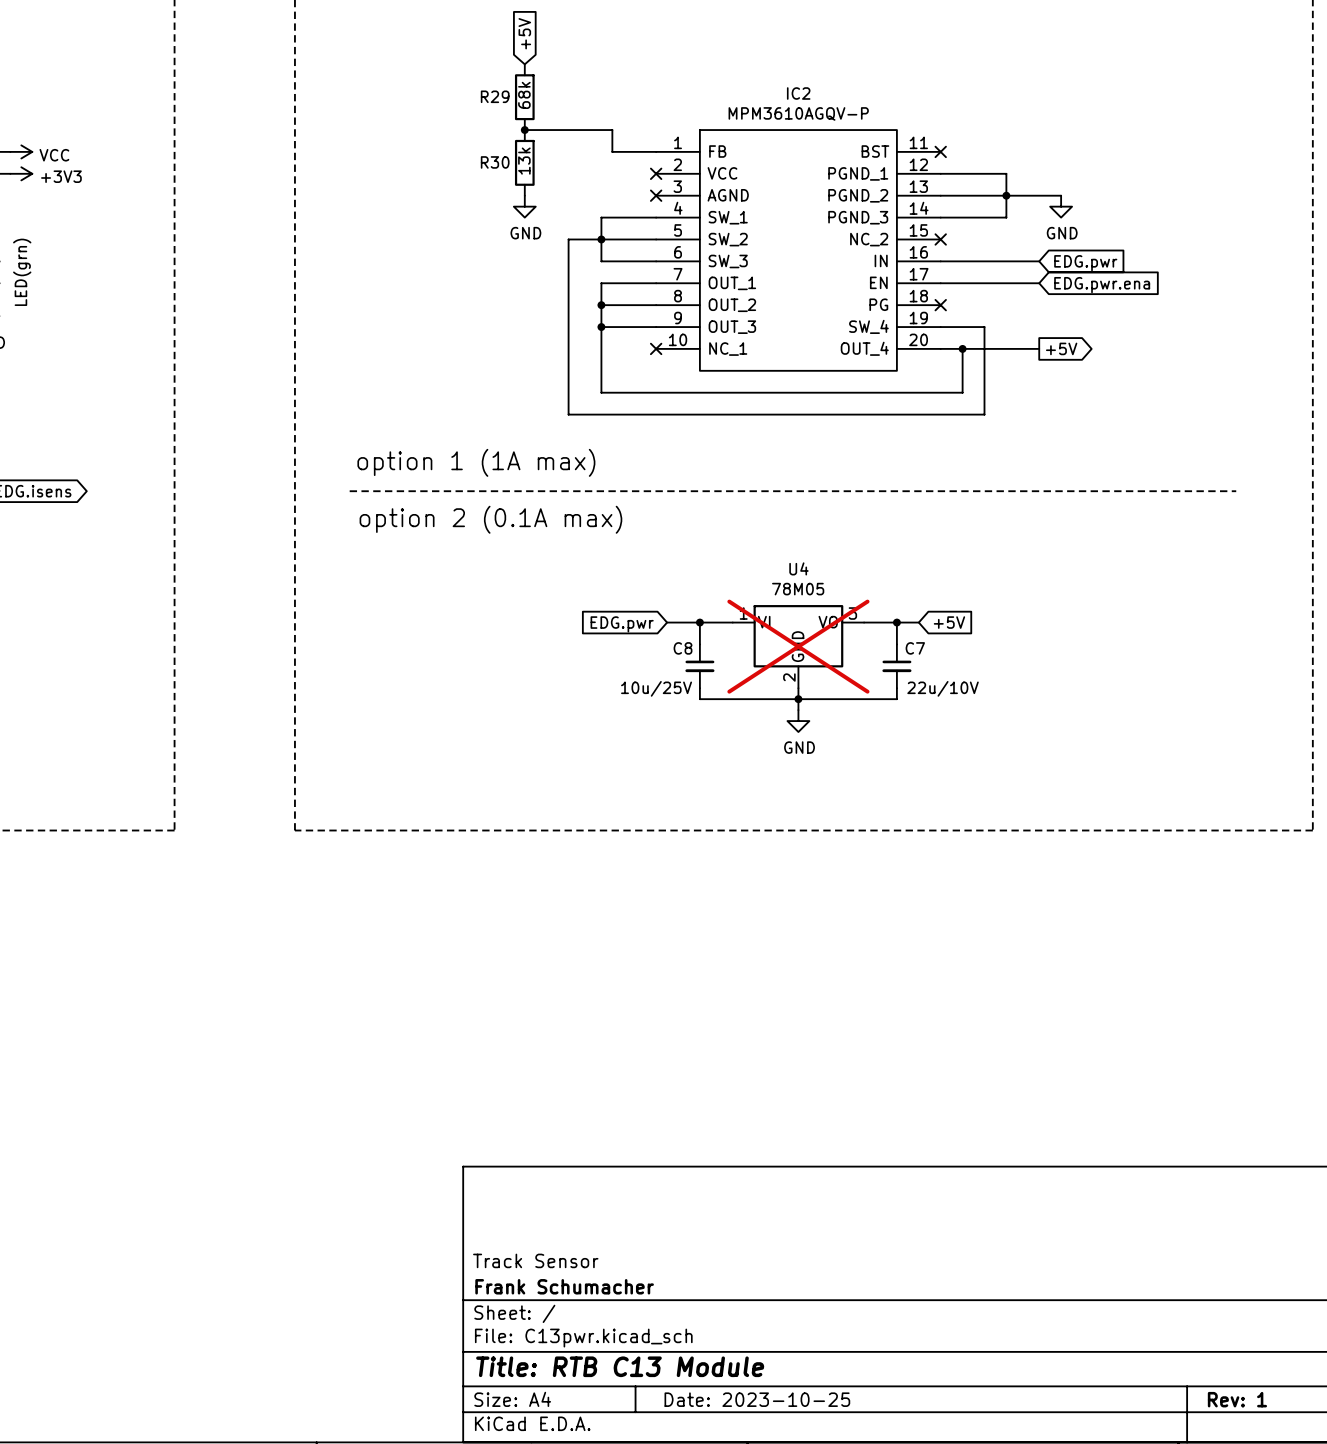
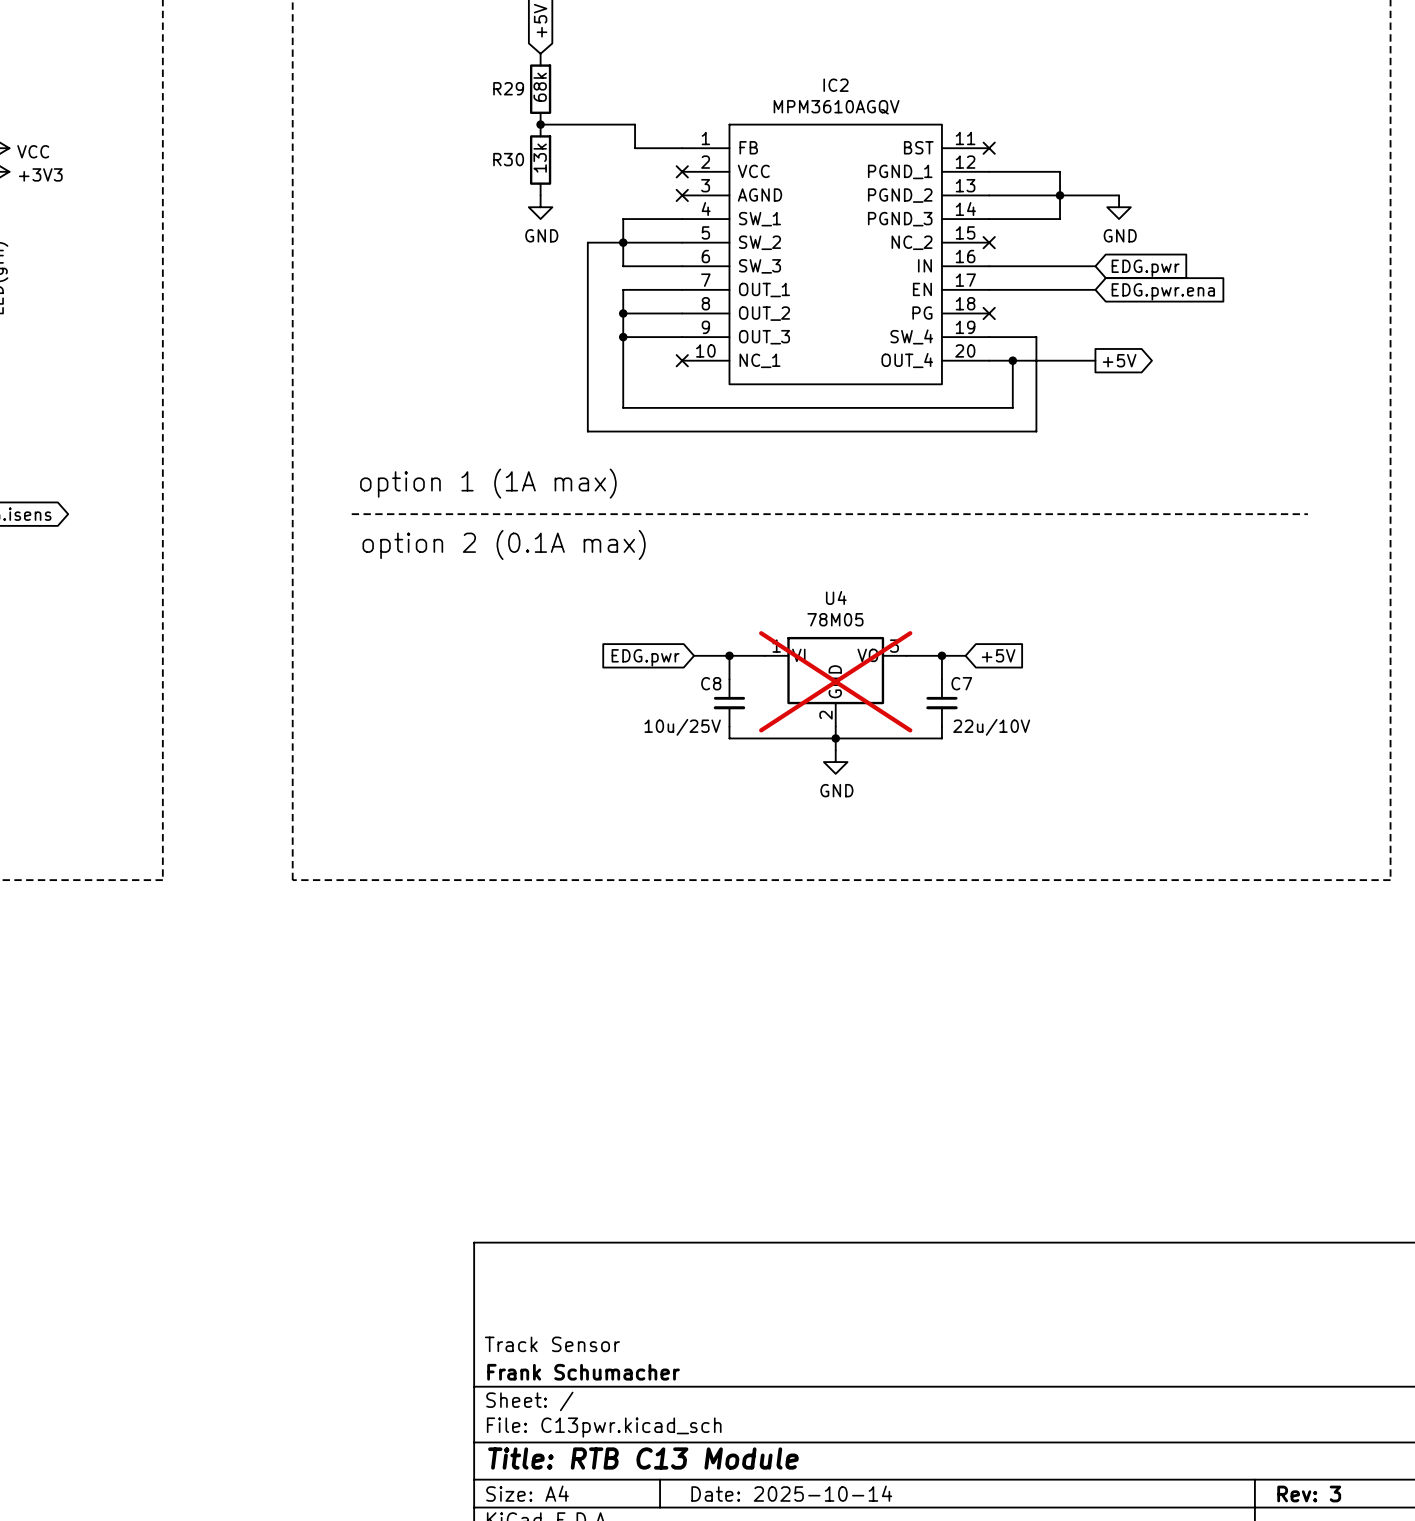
IC2 value: MPM3610AGQV-P (798, 113) -> MPM3610AGQV (836, 107)
title block: Date: 2023-10-25 (757, 1399) -> Date: 2025-10-14 (791, 1493)
title block: Rev: 1 (1237, 1399) -> Rev: 3 (1309, 1494)

